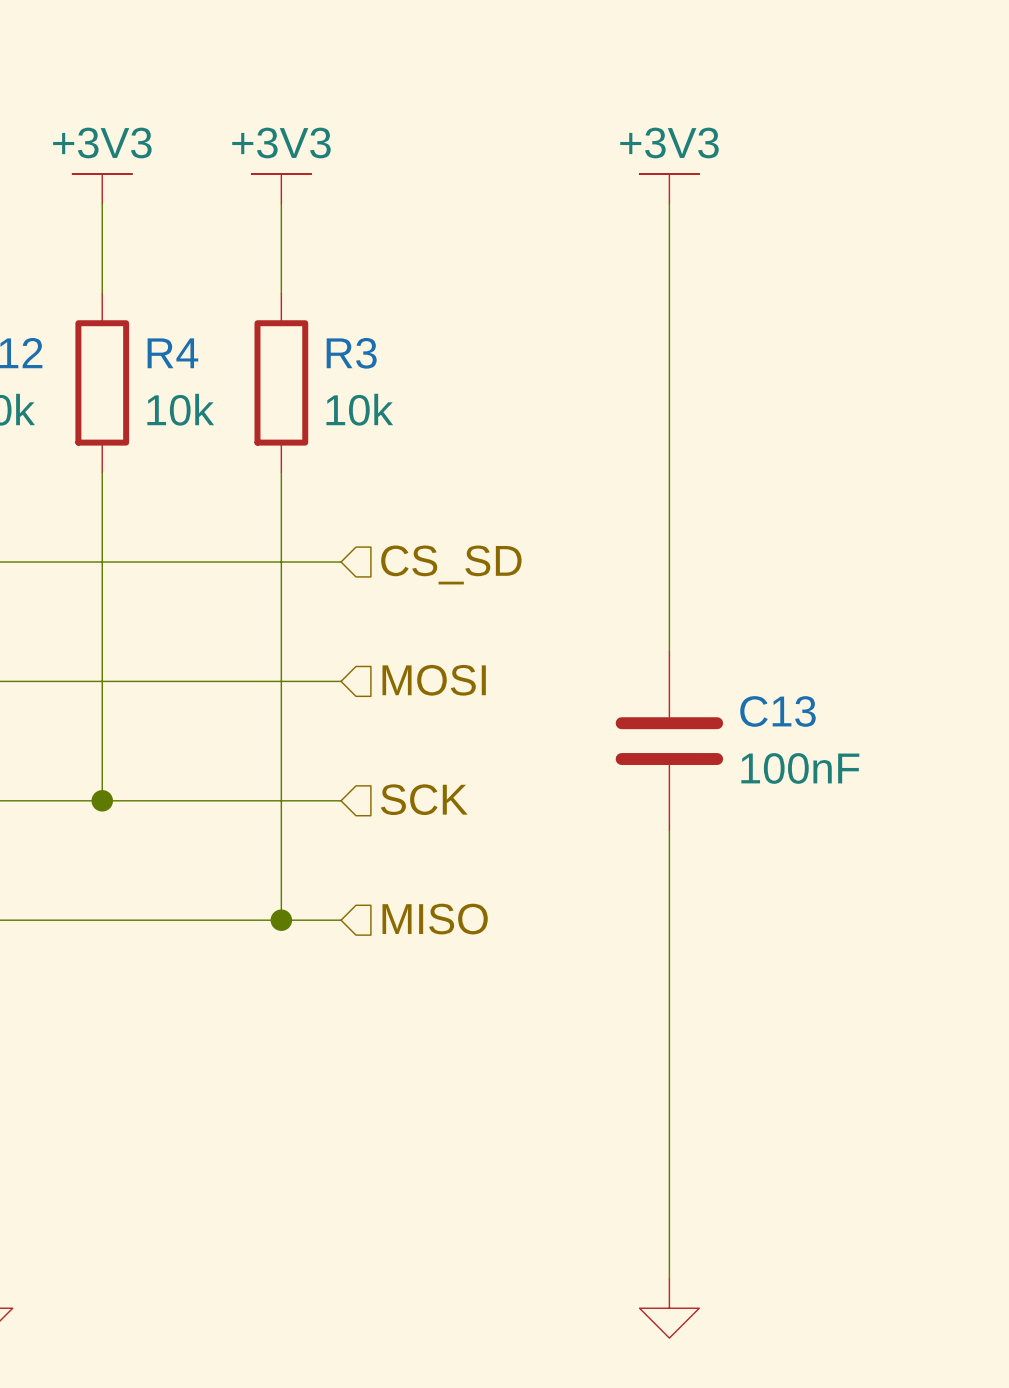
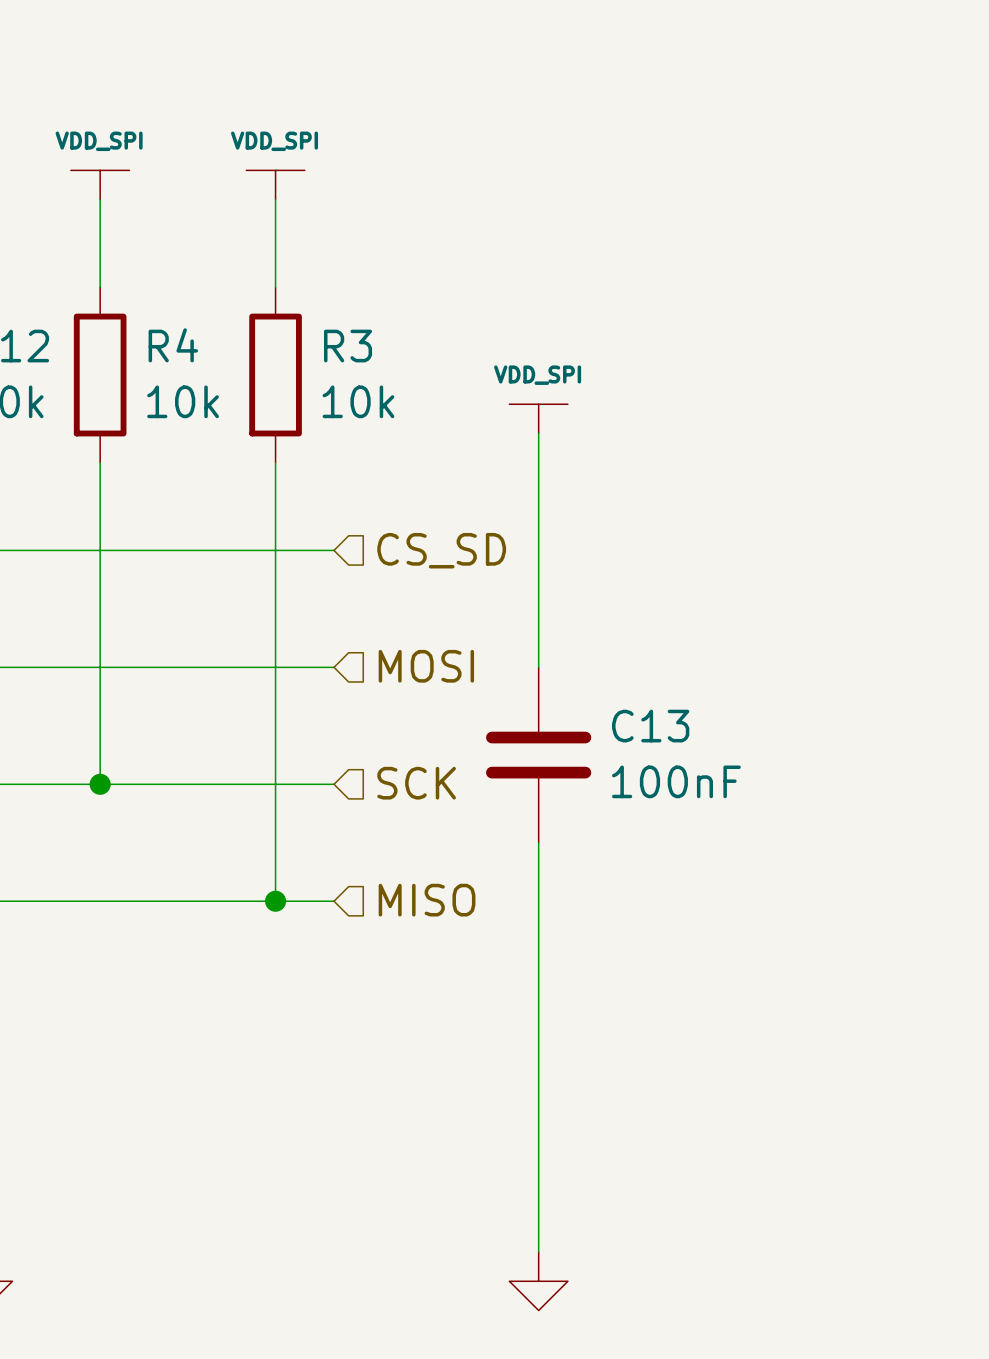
power symbol: +3V3 (102, 188) -> VDD_SPI (100, 185)
power symbol: +3V3 (281, 188) -> VDD_SPI (275, 185)
power symbol: +3V3 (669, 188) -> none
wire: (669, 203) (669, 651) -> none
power symbol: none -> VDD_SPI (538, 418)
wire: none -> (538, 433) (538, 667)
C13 position: (669, 741) -> (538, 755)
wire: (669, 830) (669, 1278) -> none
wire: none -> (538, 842) (538, 1252)
power symbol position: (669, 1308) -> (538, 1281)

